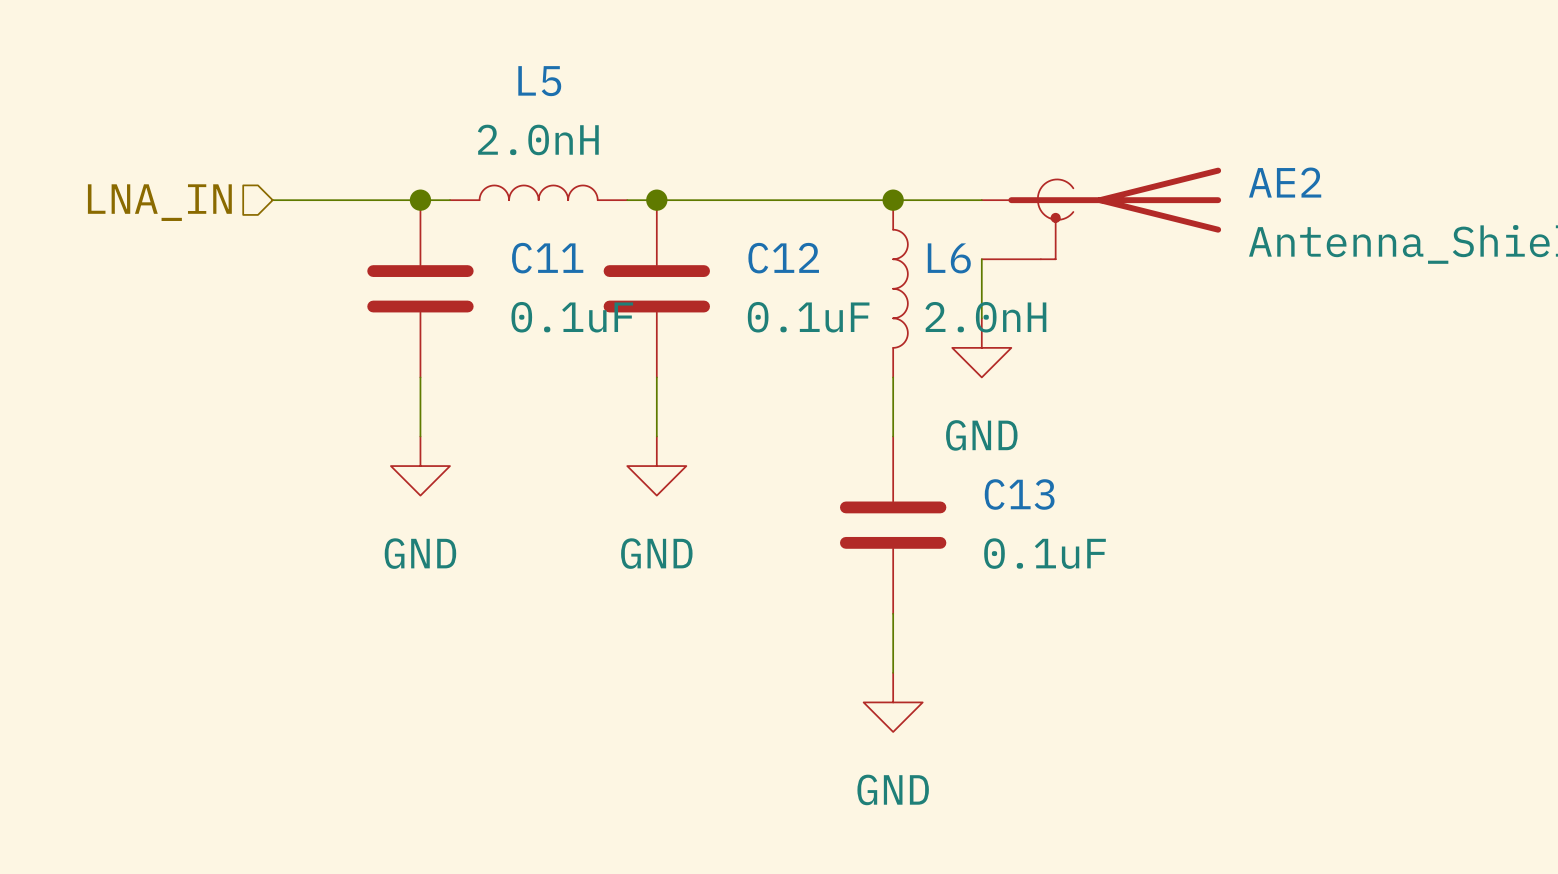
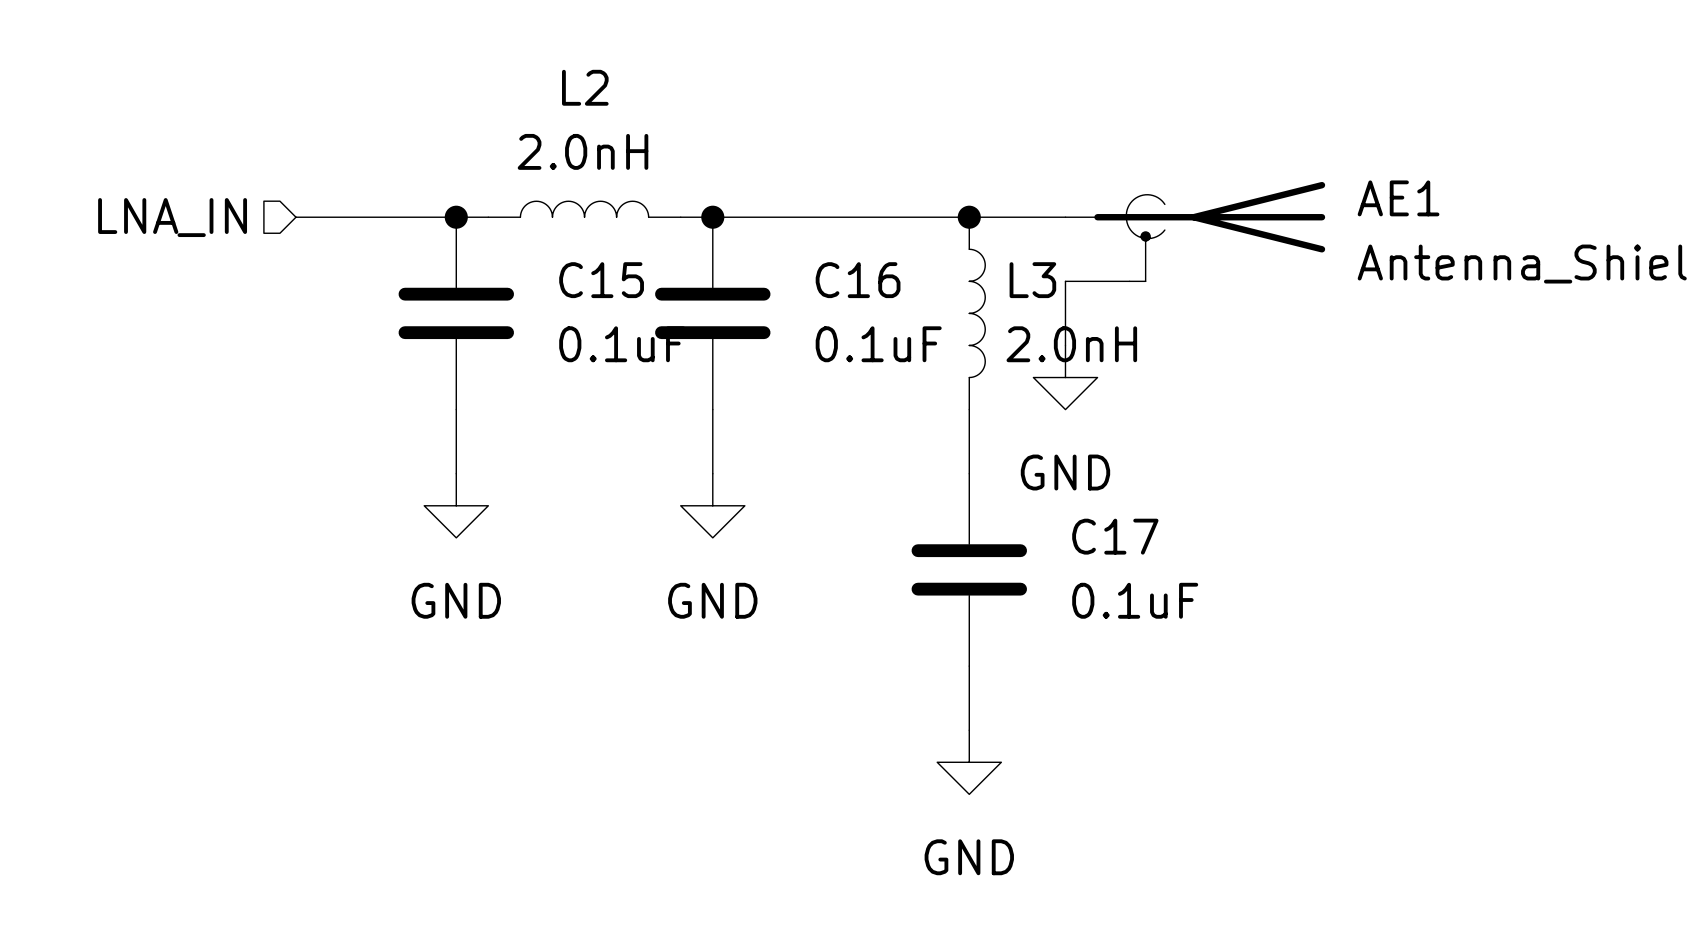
L5 name: L5 (539, 81) -> L2 (585, 87)
AE2 name: AE2 (1285, 182) -> AE1 (1398, 198)
C11 name: C11 (547, 258) -> C15 (601, 280)
C12 name: C12 (783, 258) -> C16 (858, 280)
L6 name: L6 (949, 258) -> L3 (1032, 280)
C13 name: C13 (1019, 494) -> C17 (1115, 536)

